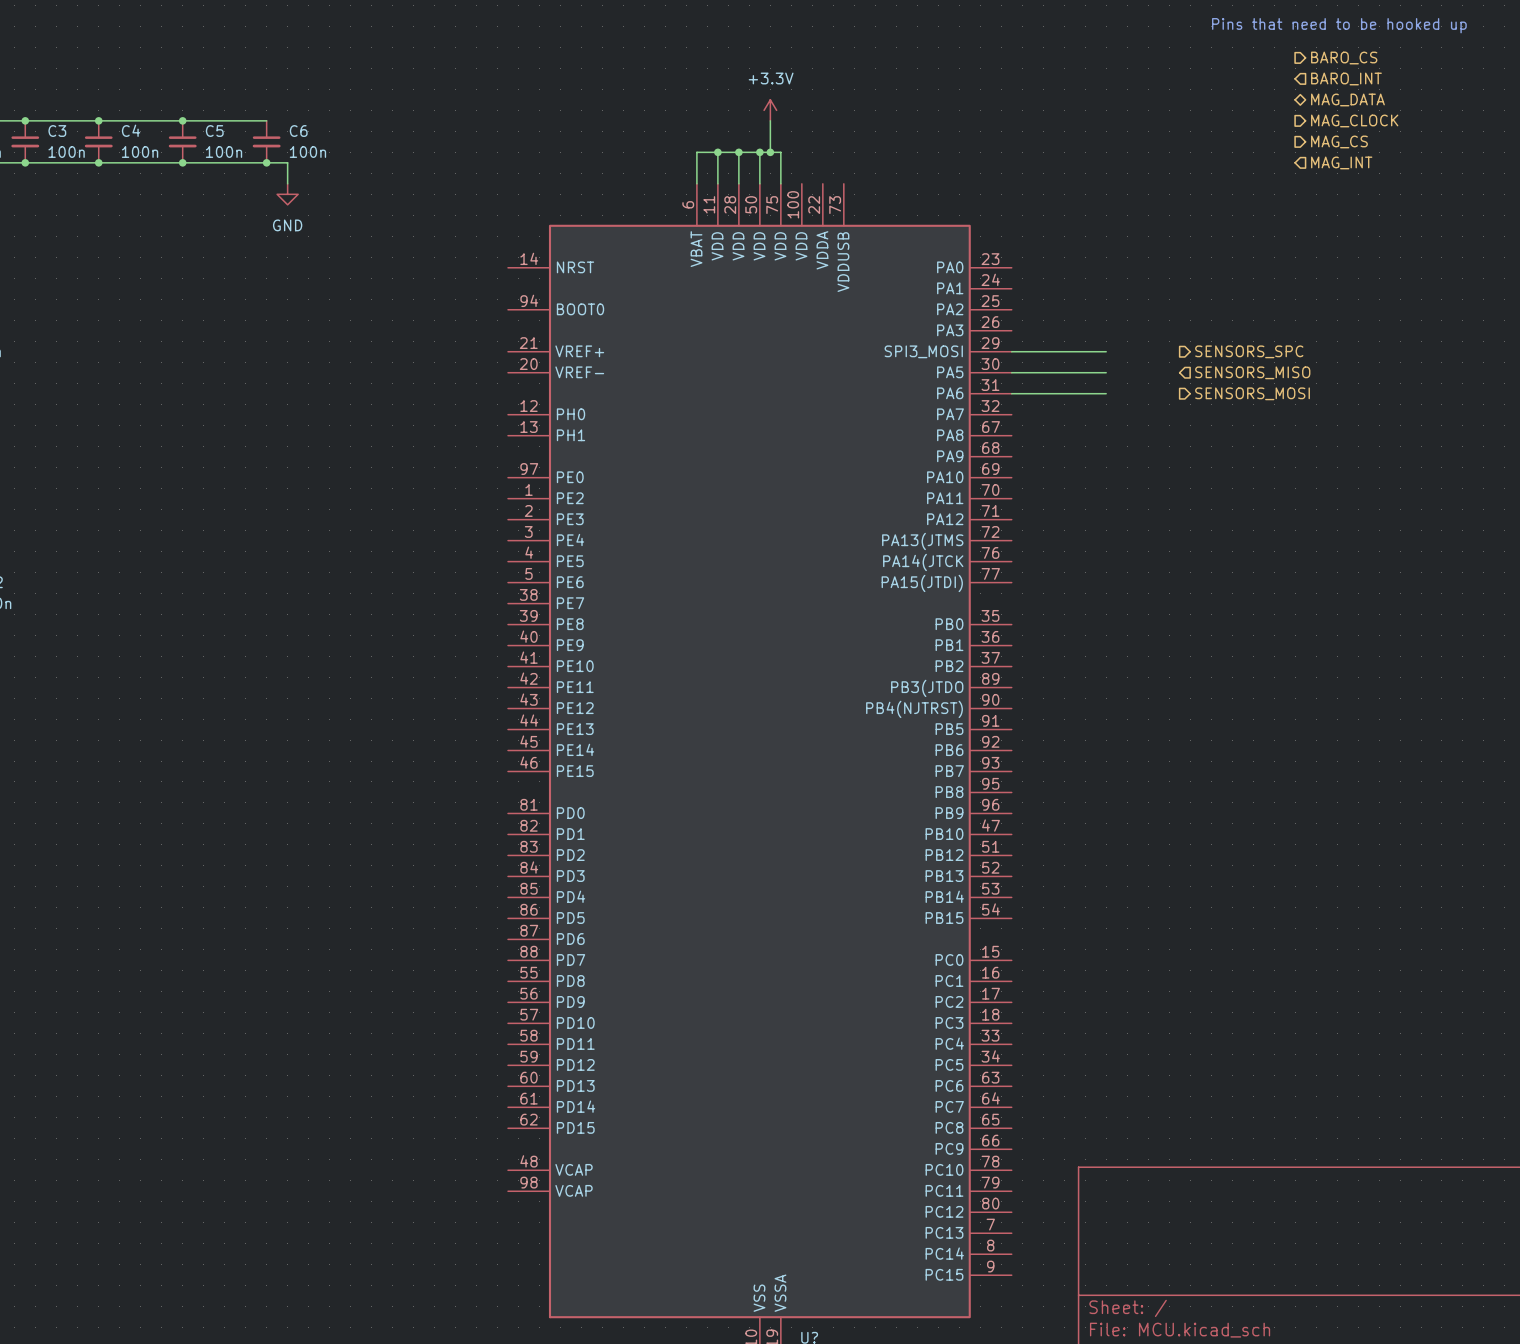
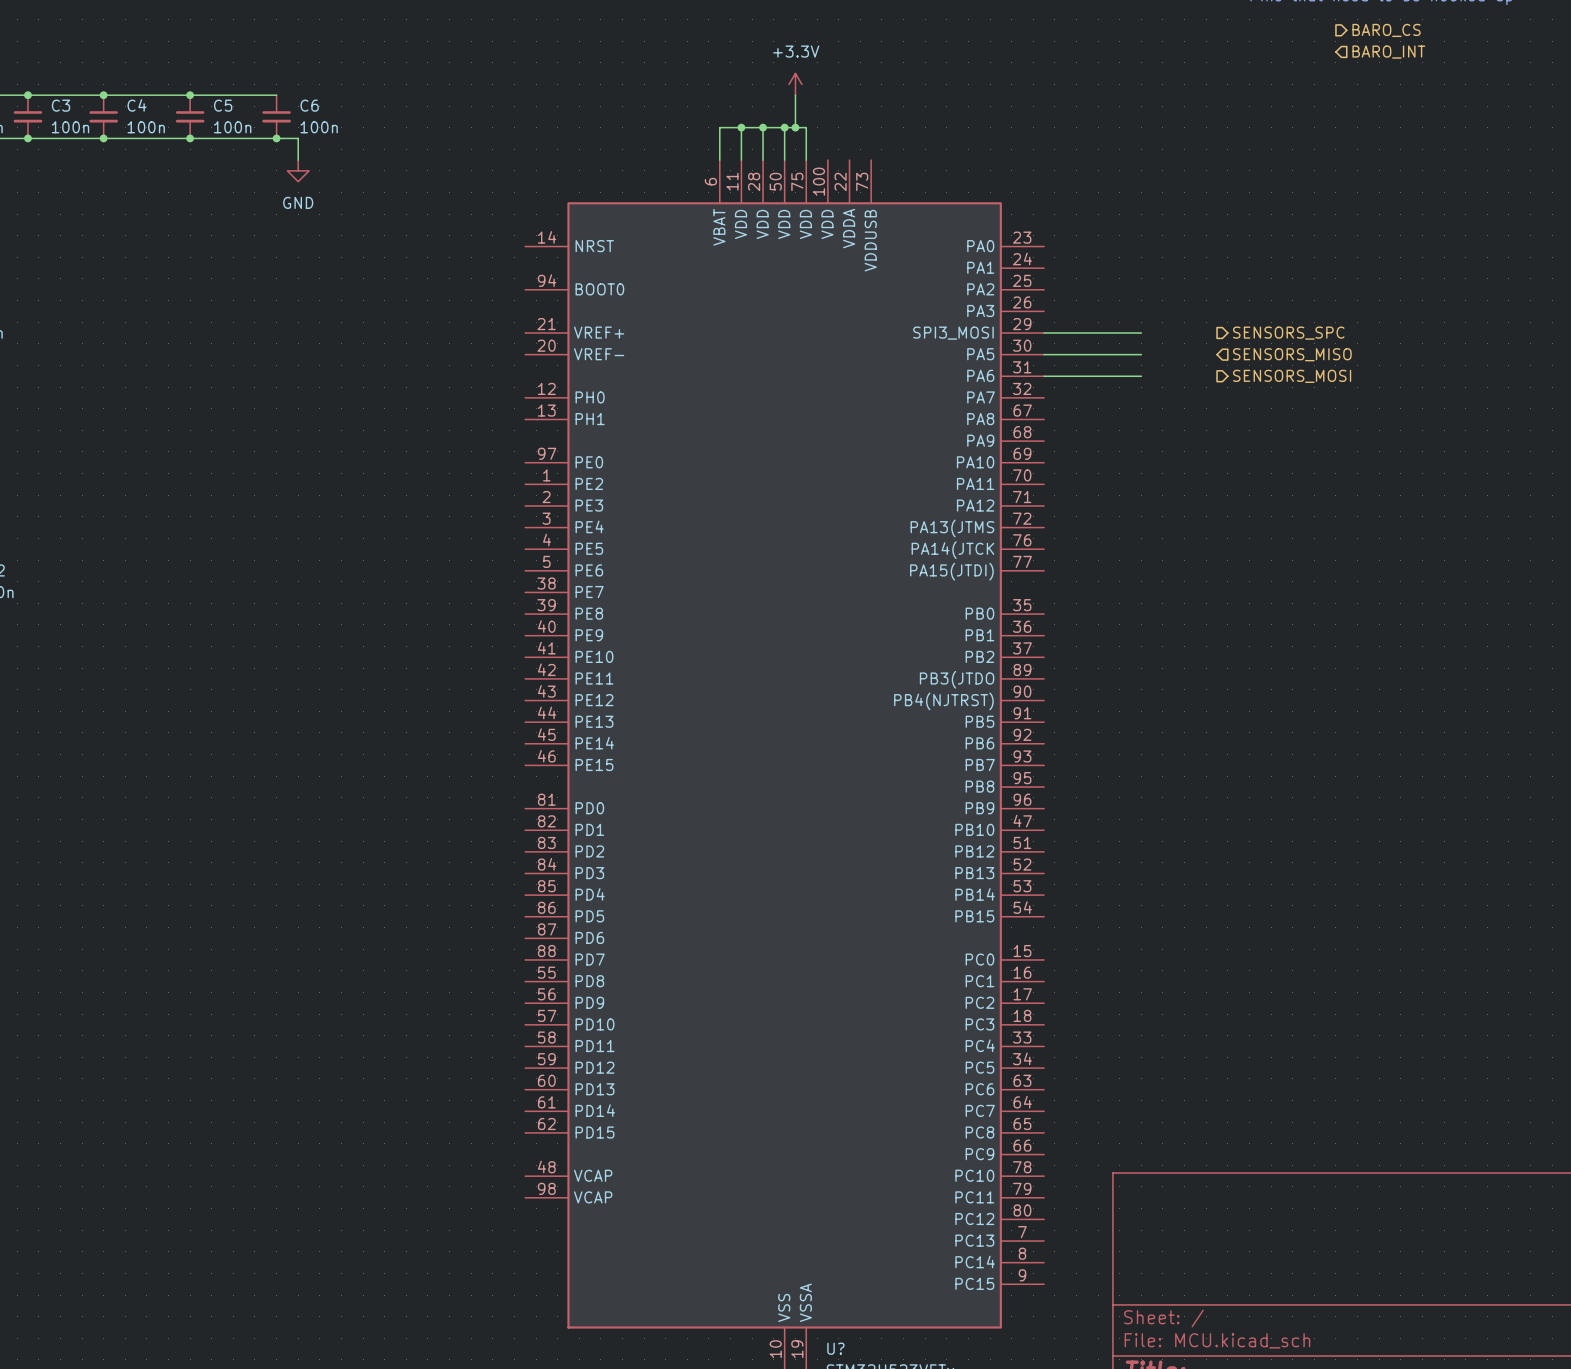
hierarchical label: MAG_DATA (1347, 99) -> none
hierarchical label: MAG_CLOCK (1354, 120) -> none
hierarchical label: MAG_CS (1339, 141) -> none
hierarchical label: MAG_INT (1341, 162) -> none

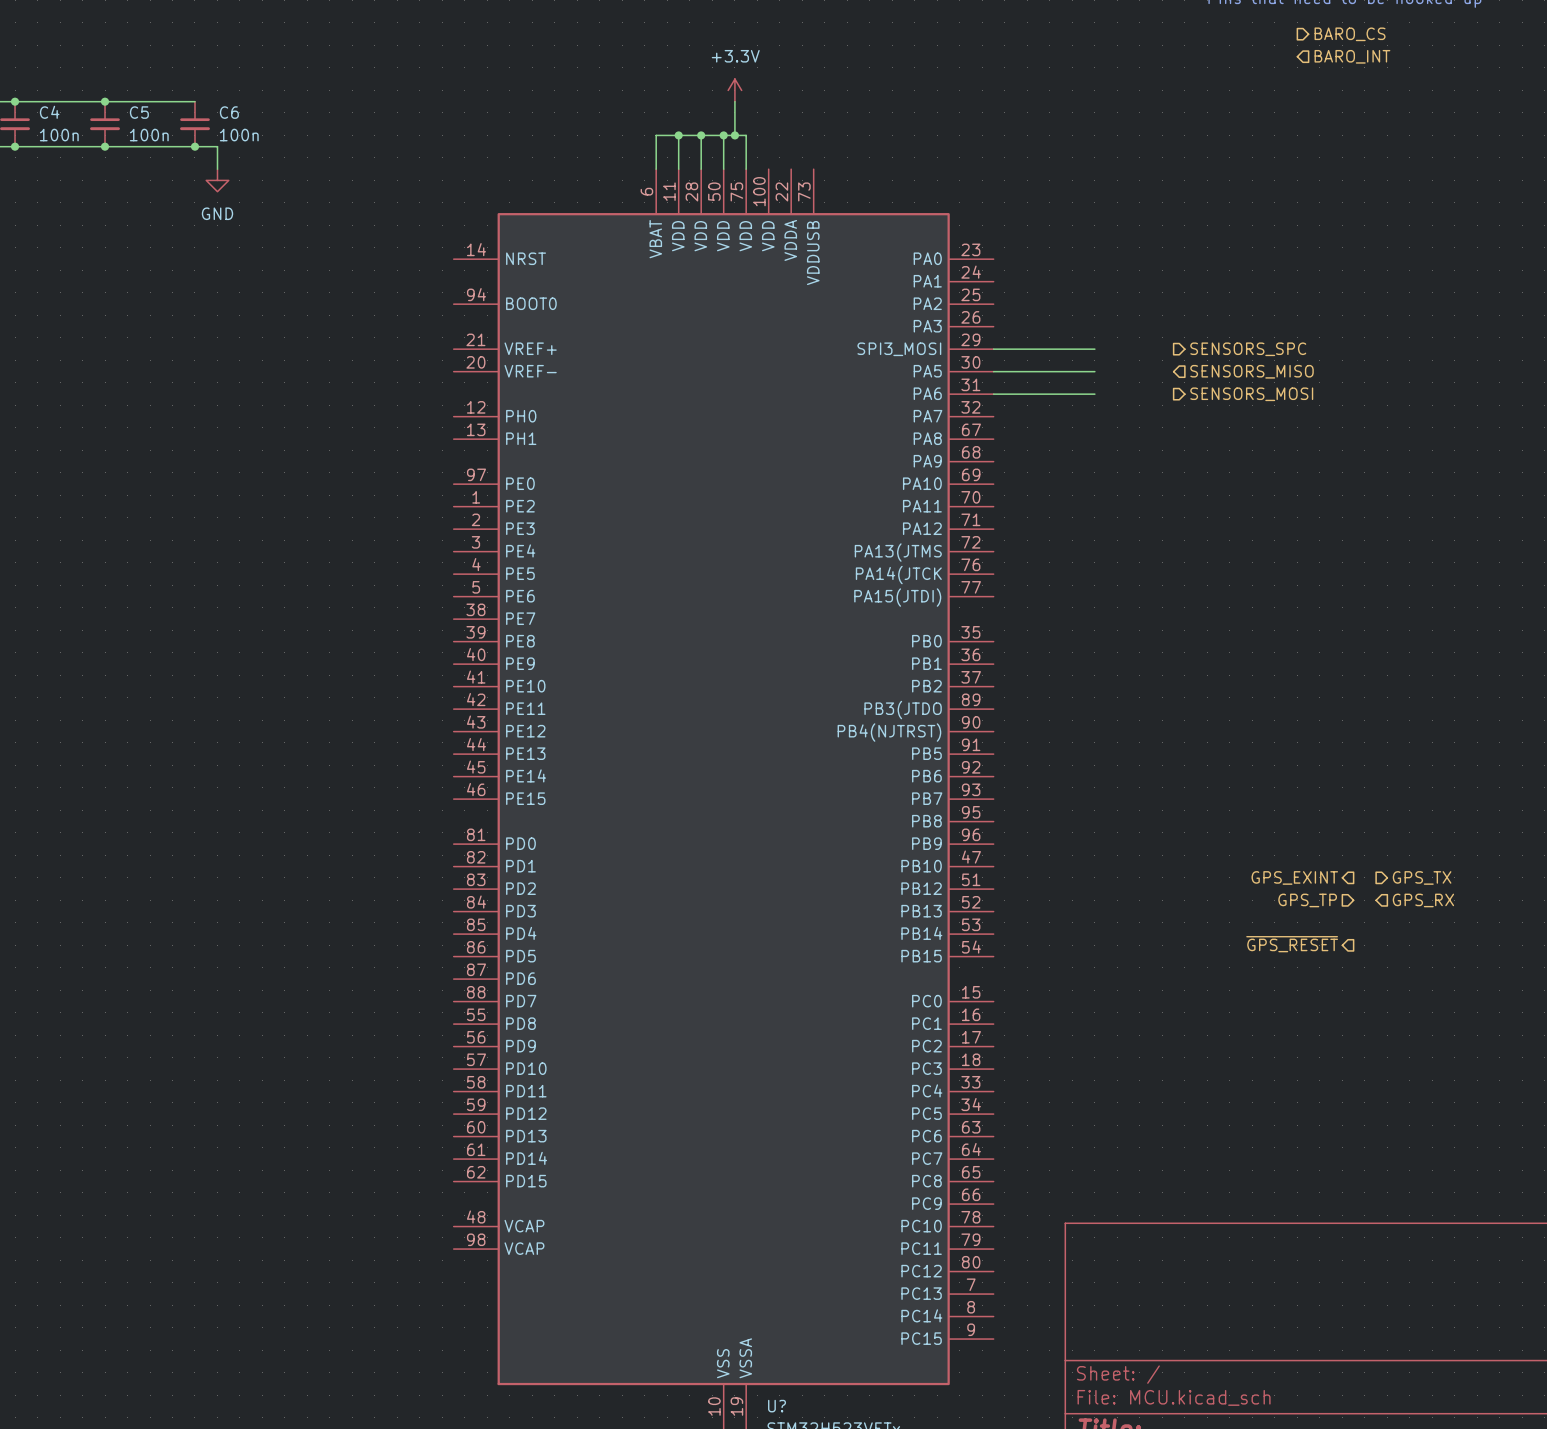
hierarchical label: none -> GPS_EXINT (1294, 877)
hierarchical label: none -> GPS_TX (1422, 877)
hierarchical label: none -> GPS_TP (1307, 900)
hierarchical label: none -> GPS_RX (1423, 900)
hierarchical label: none -> ~{GPS_RESET} (1292, 944)

